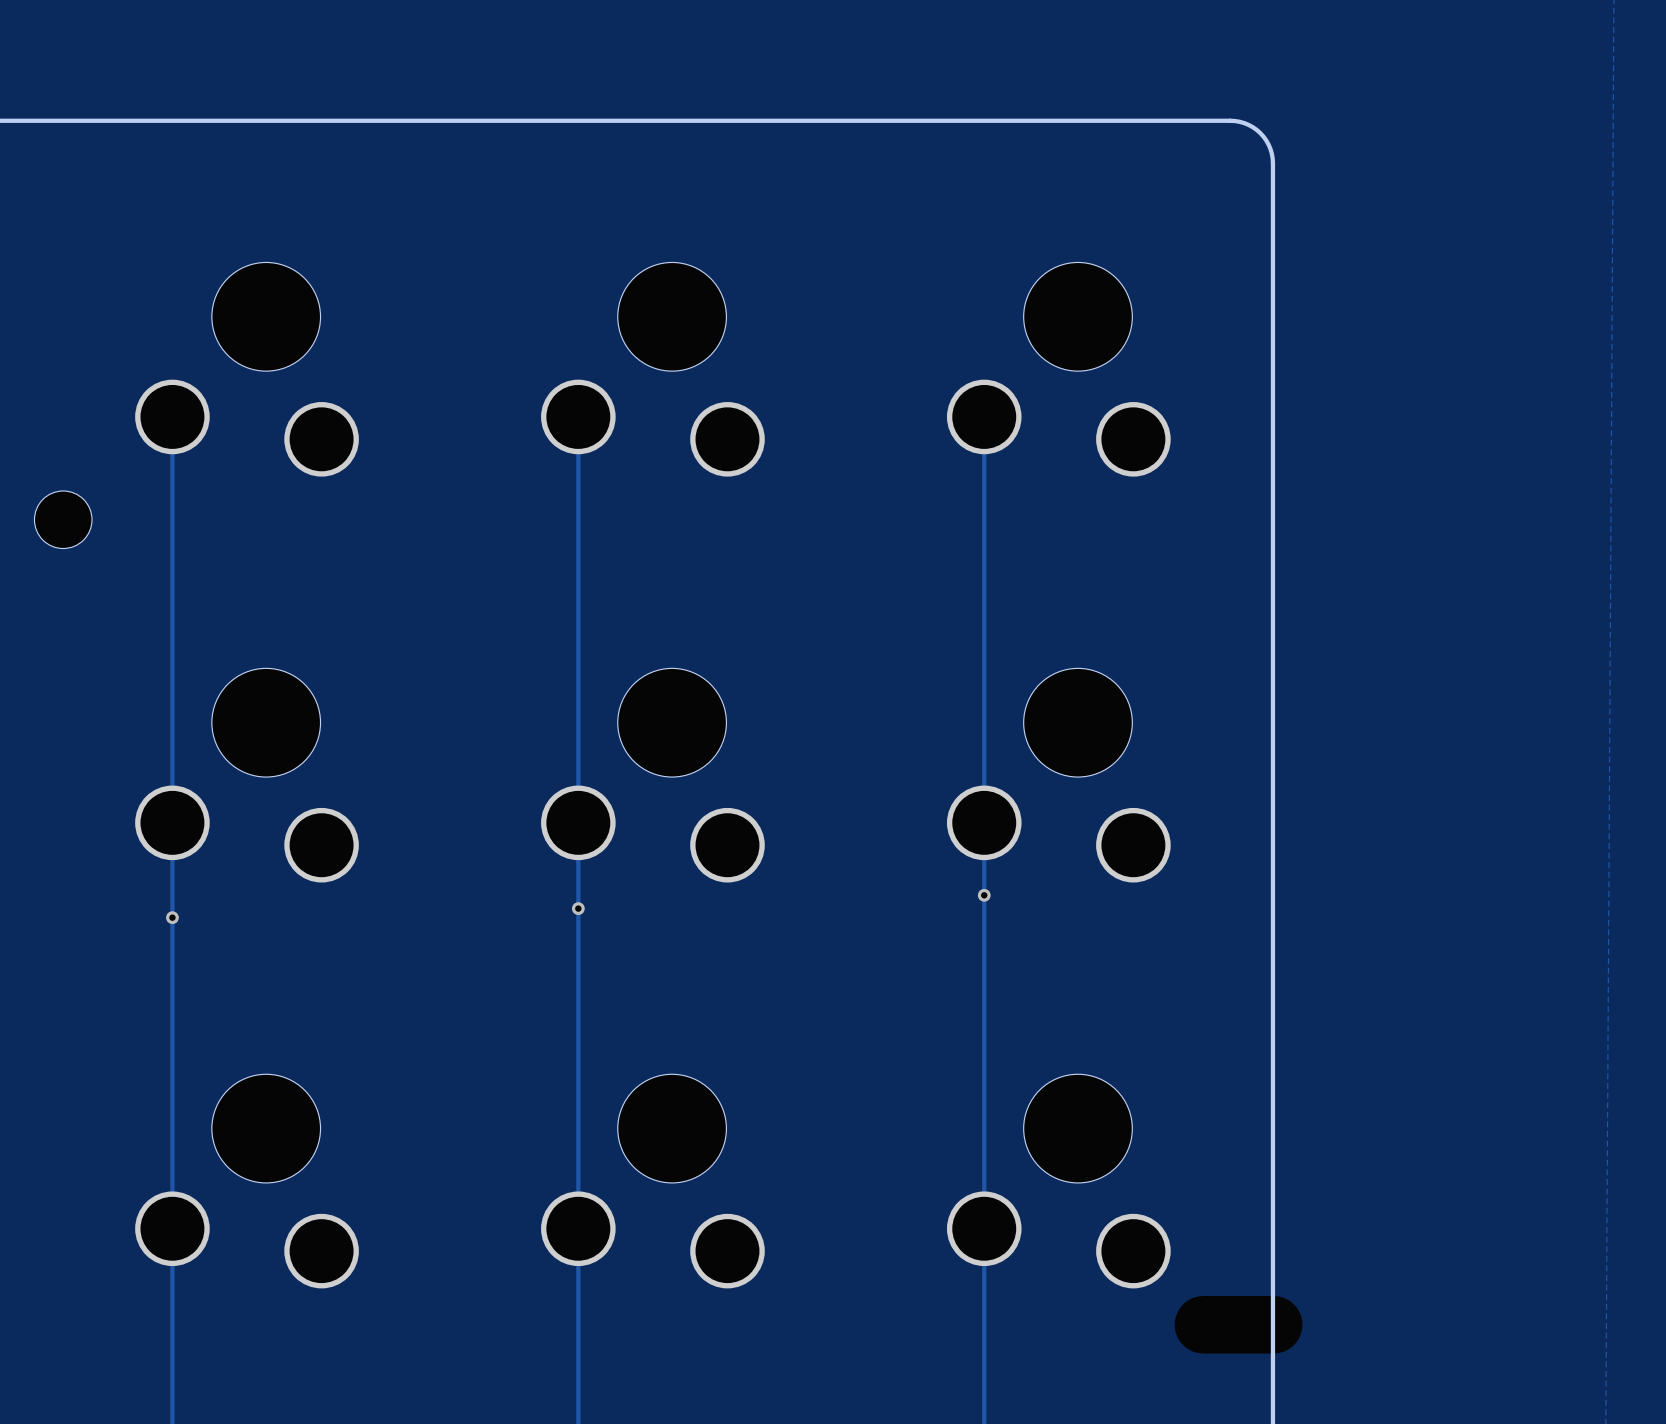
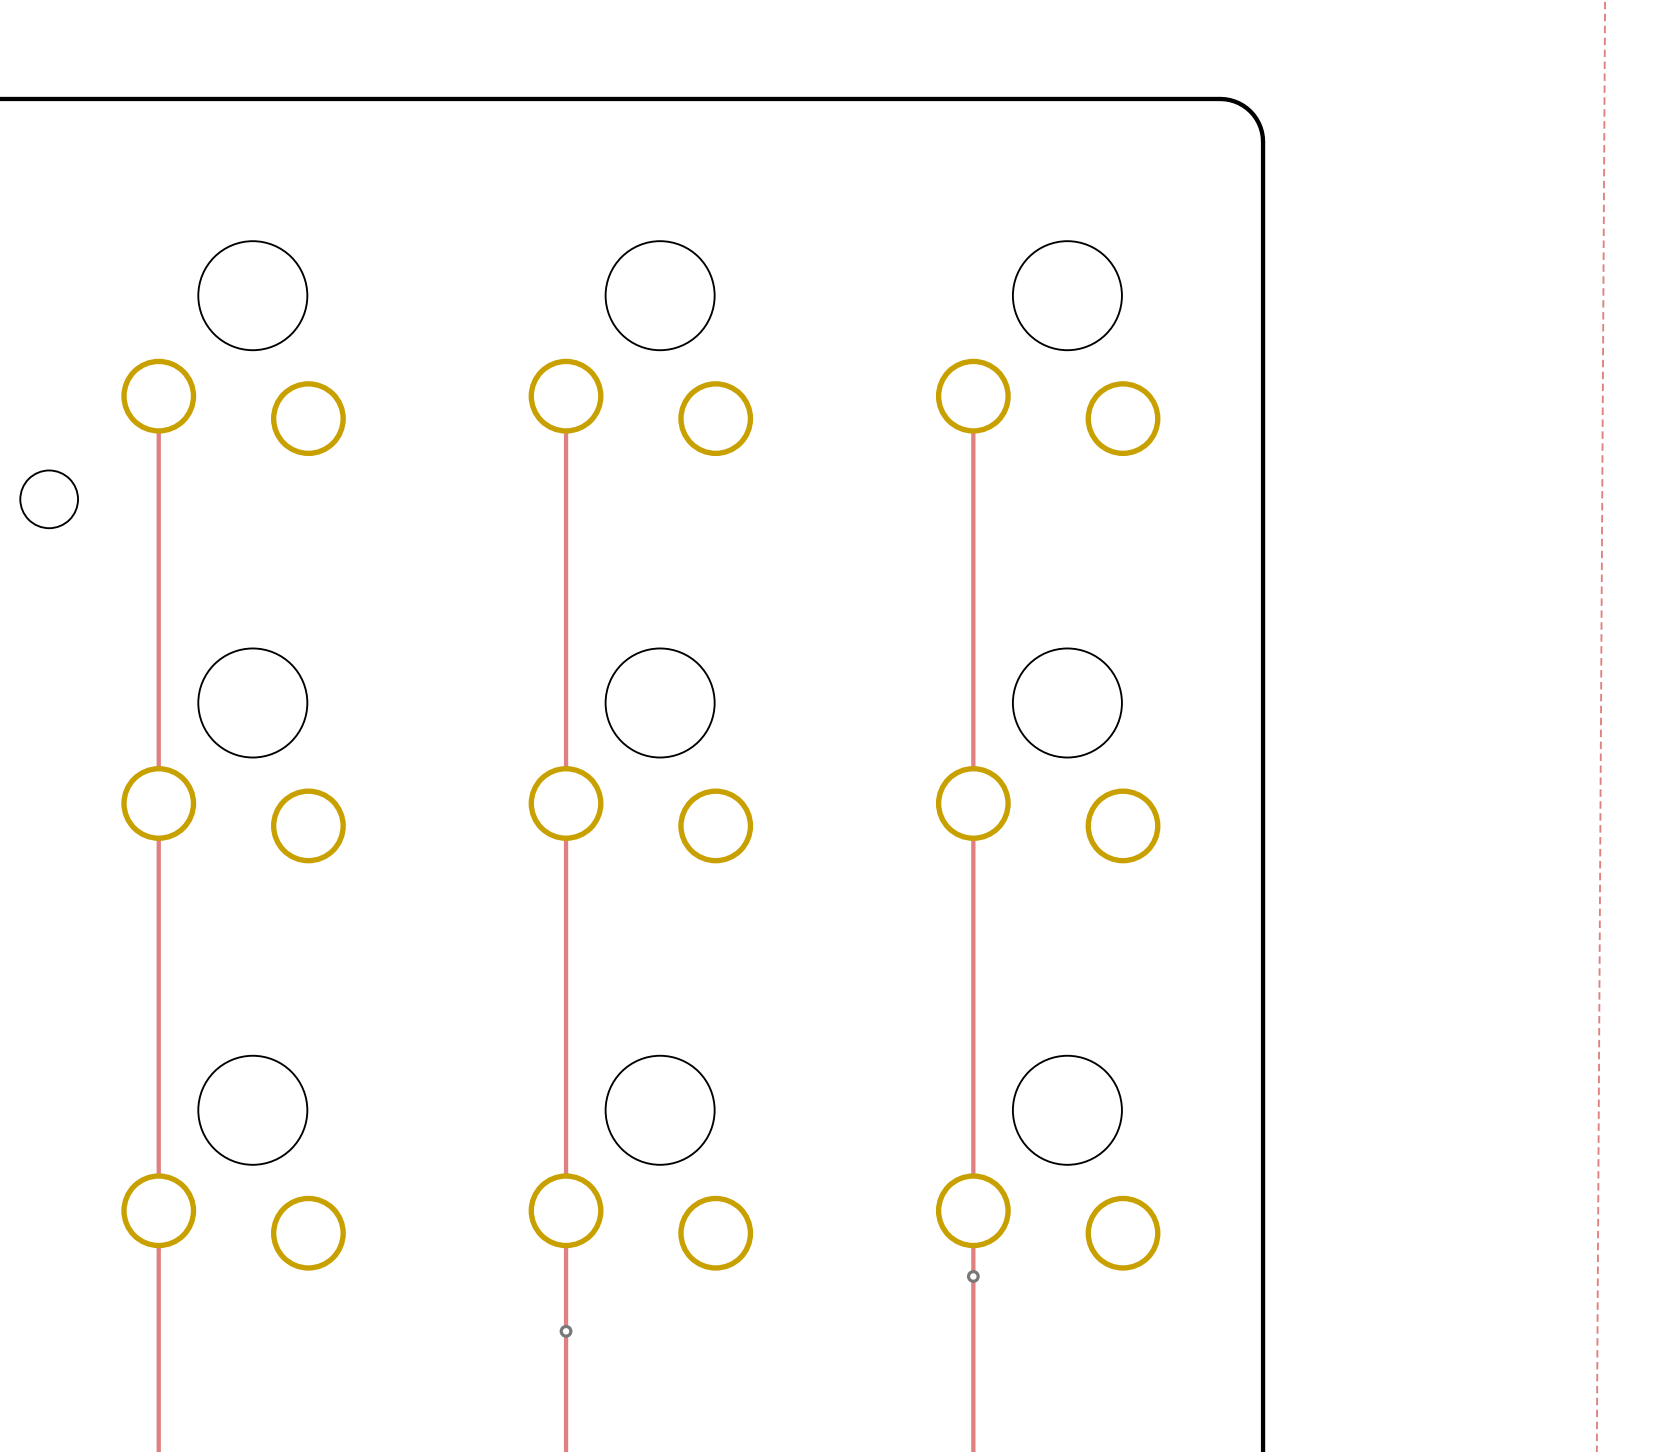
via: (984, 895) -> none
via: (578, 908) -> none
via: (172, 917) -> none
via: none -> (973, 1276)
via: none -> (566, 1331)

